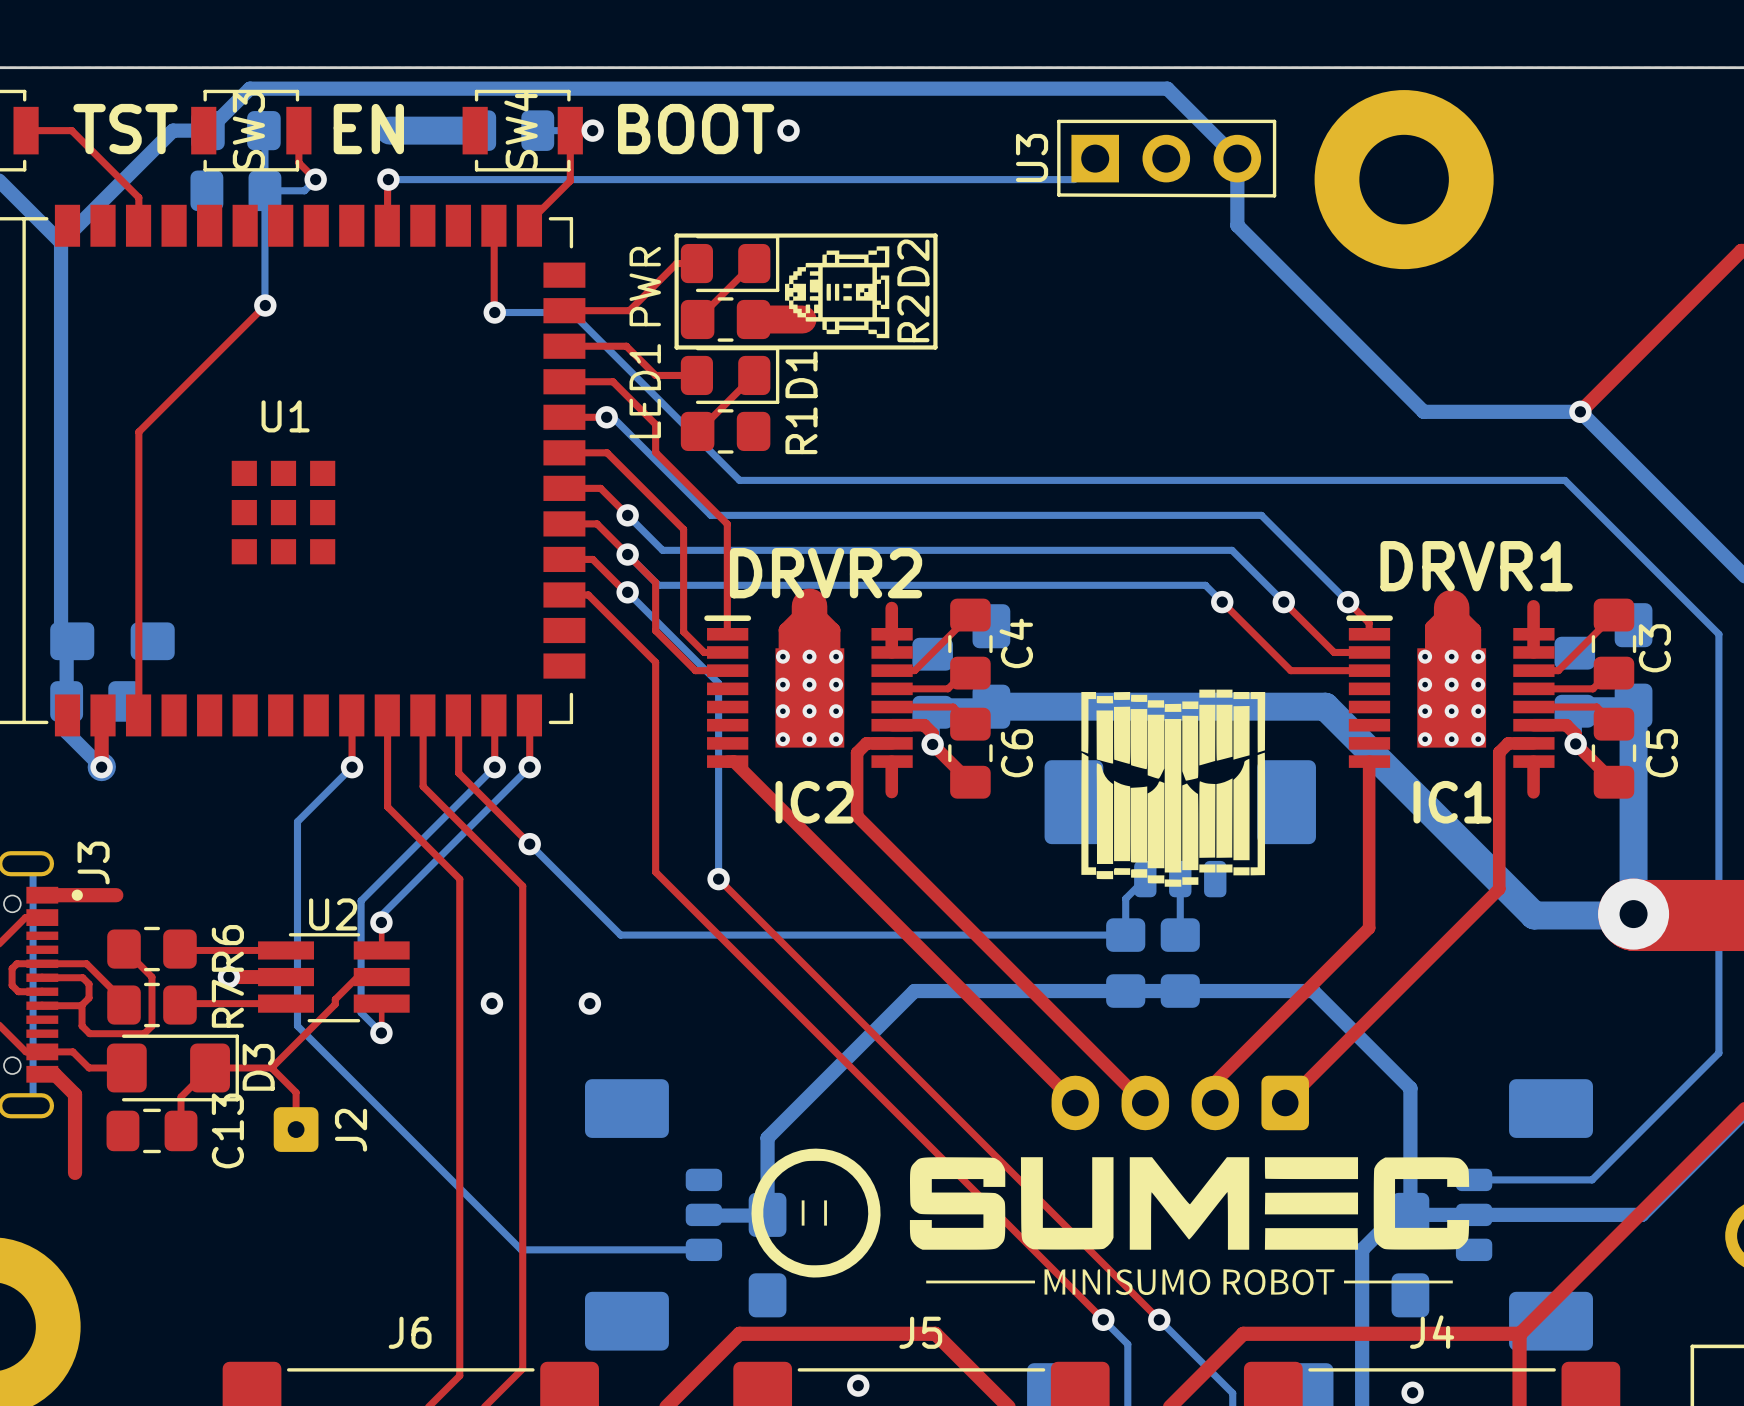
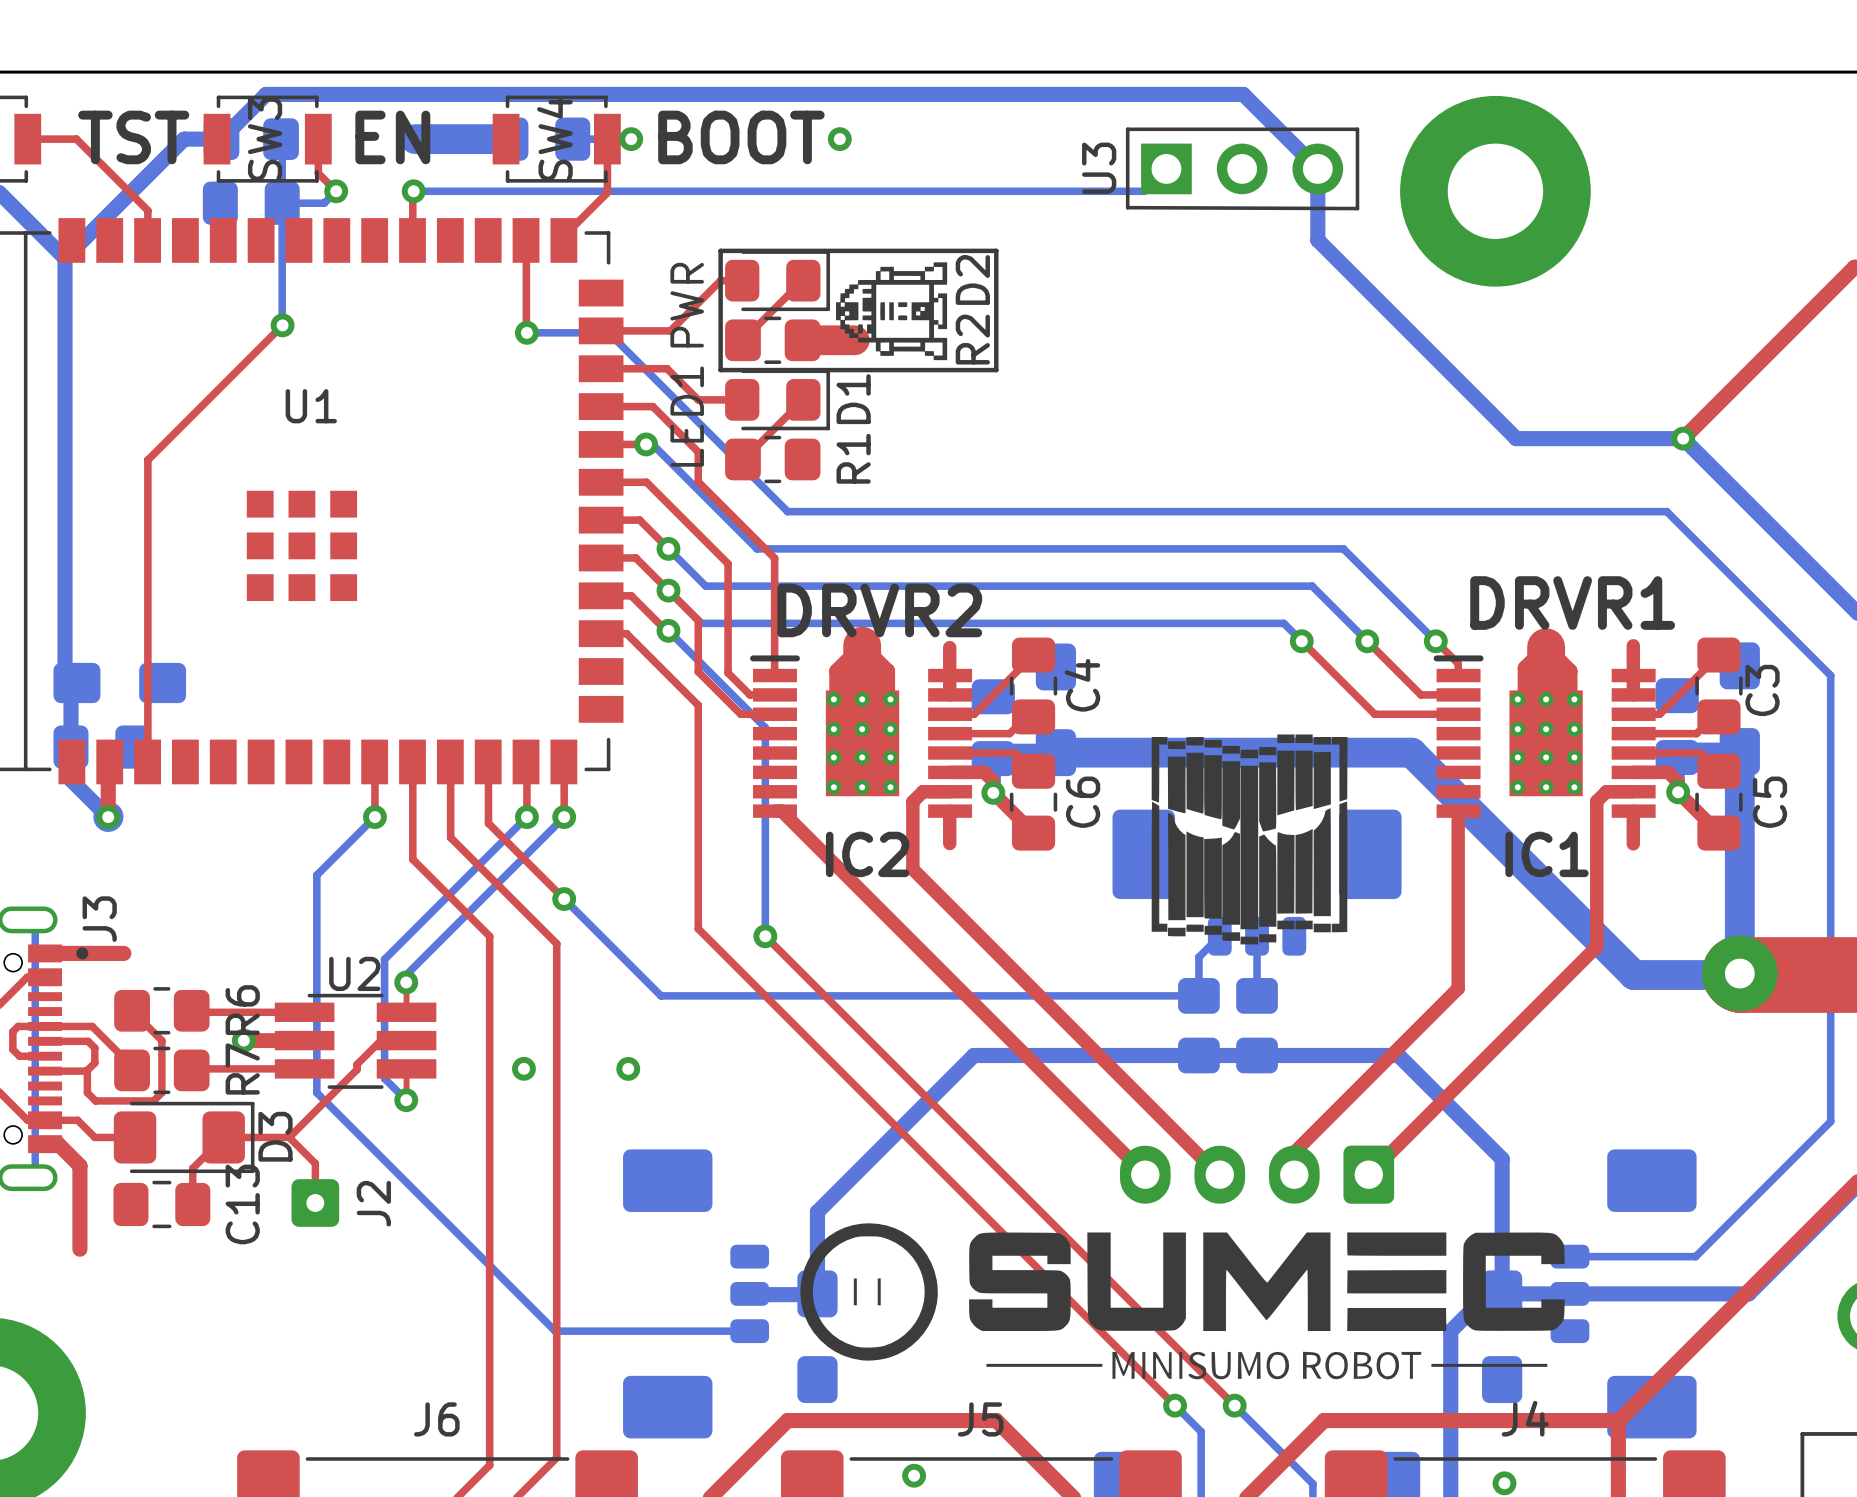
U1 name position: U1 (285, 416) -> U1 (311, 406)

